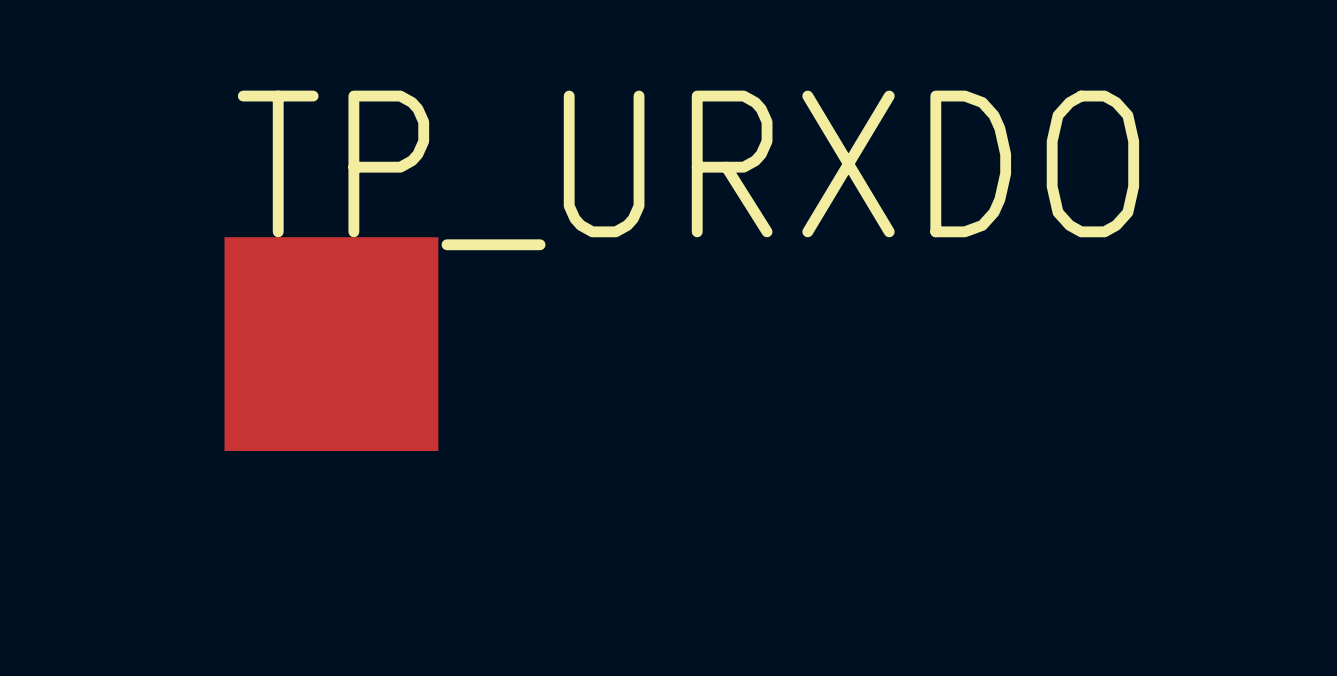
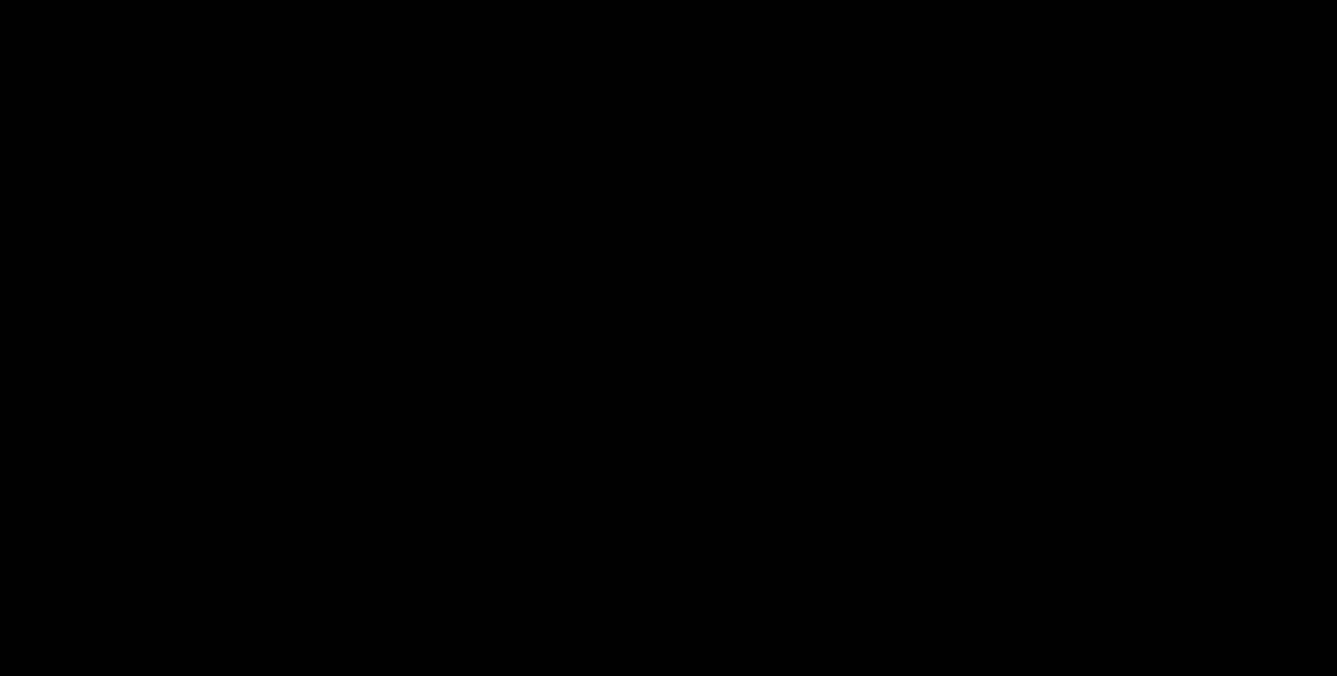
TP_URXDO: (331, 344) -> none

